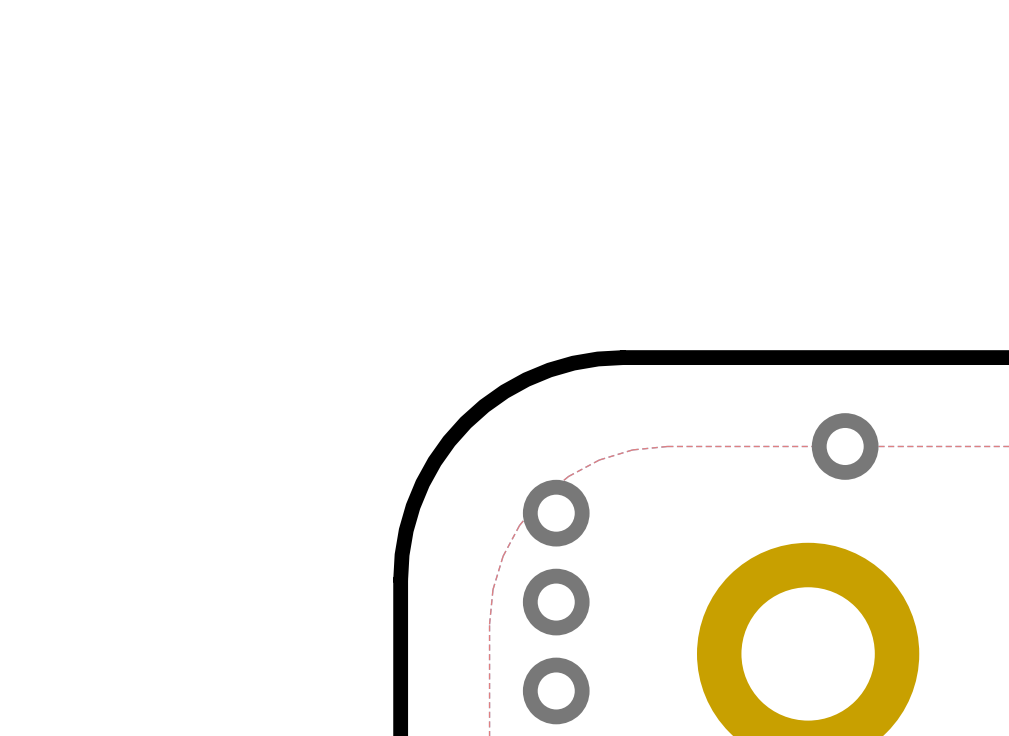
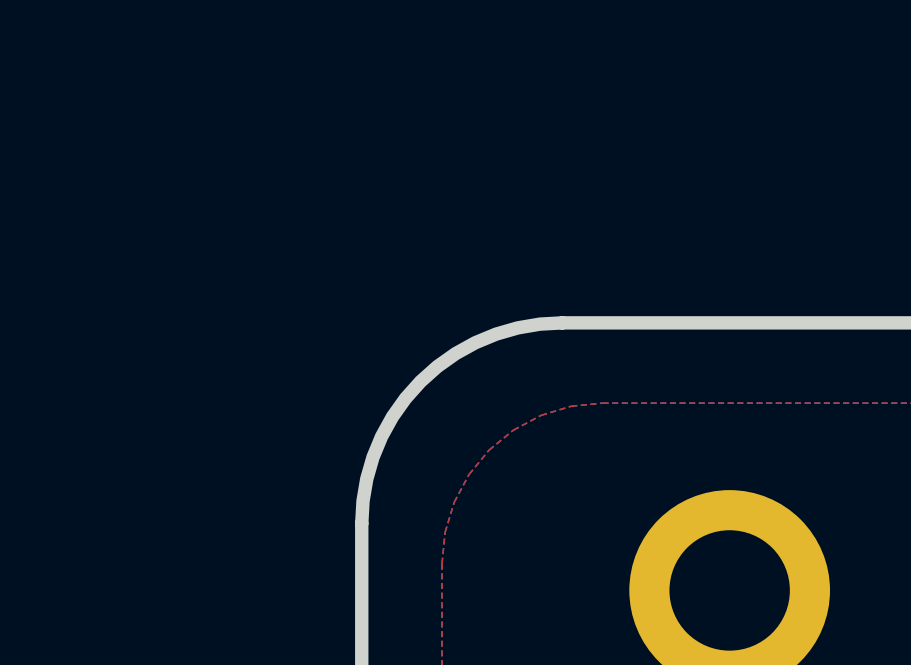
via: (845, 446) -> none
via: (556, 513) -> none
via: (556, 602) -> none
via: (556, 690) -> none

